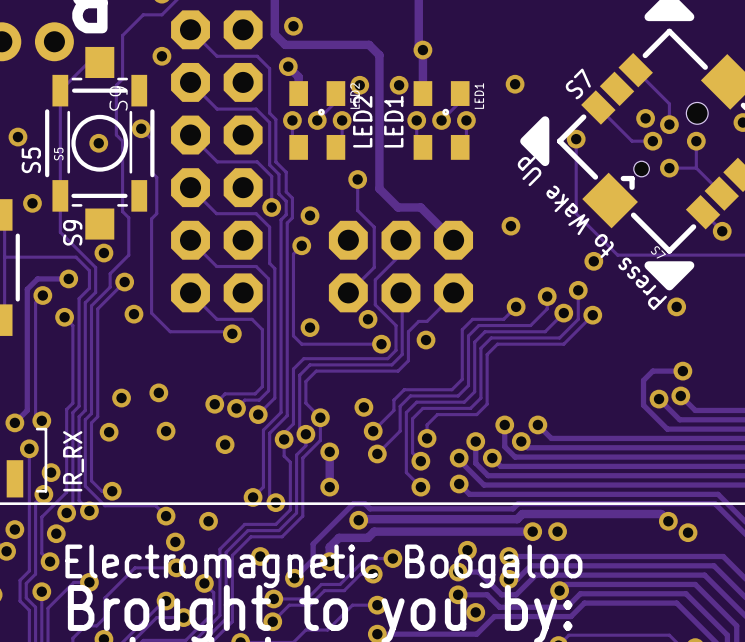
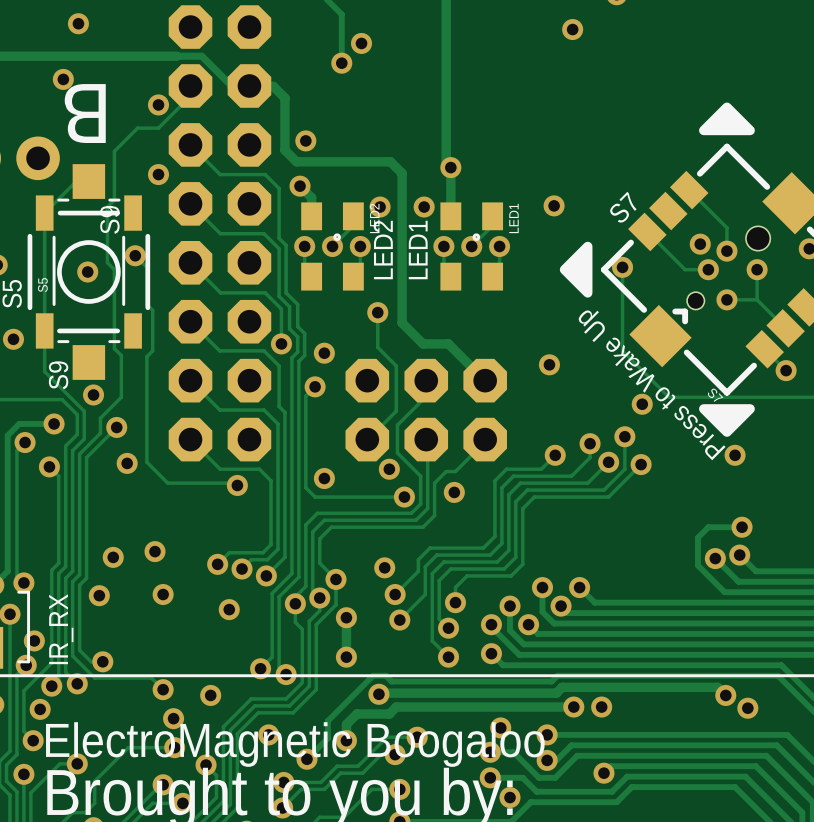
text: Electromagnetic Boogaloo (323, 566) -> ElectroMagnetic Boogaloo (295, 744)

